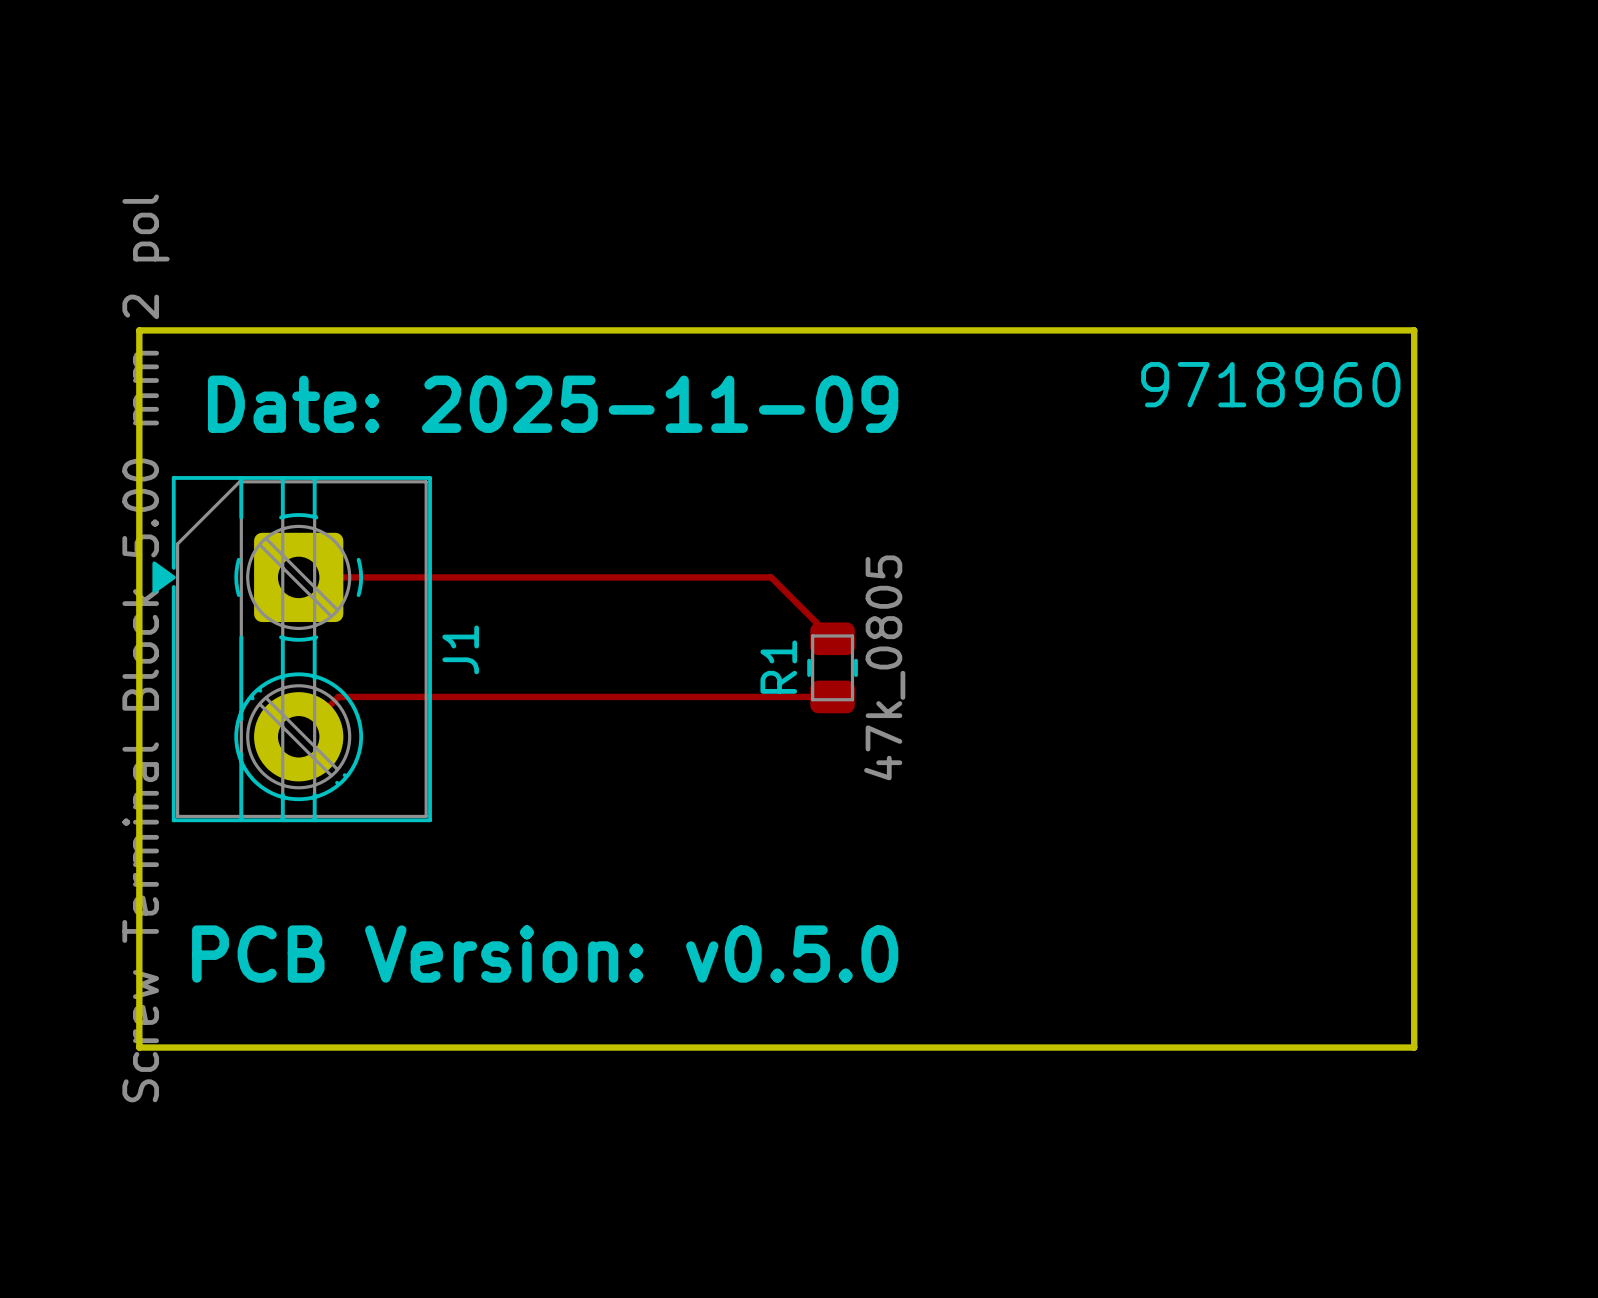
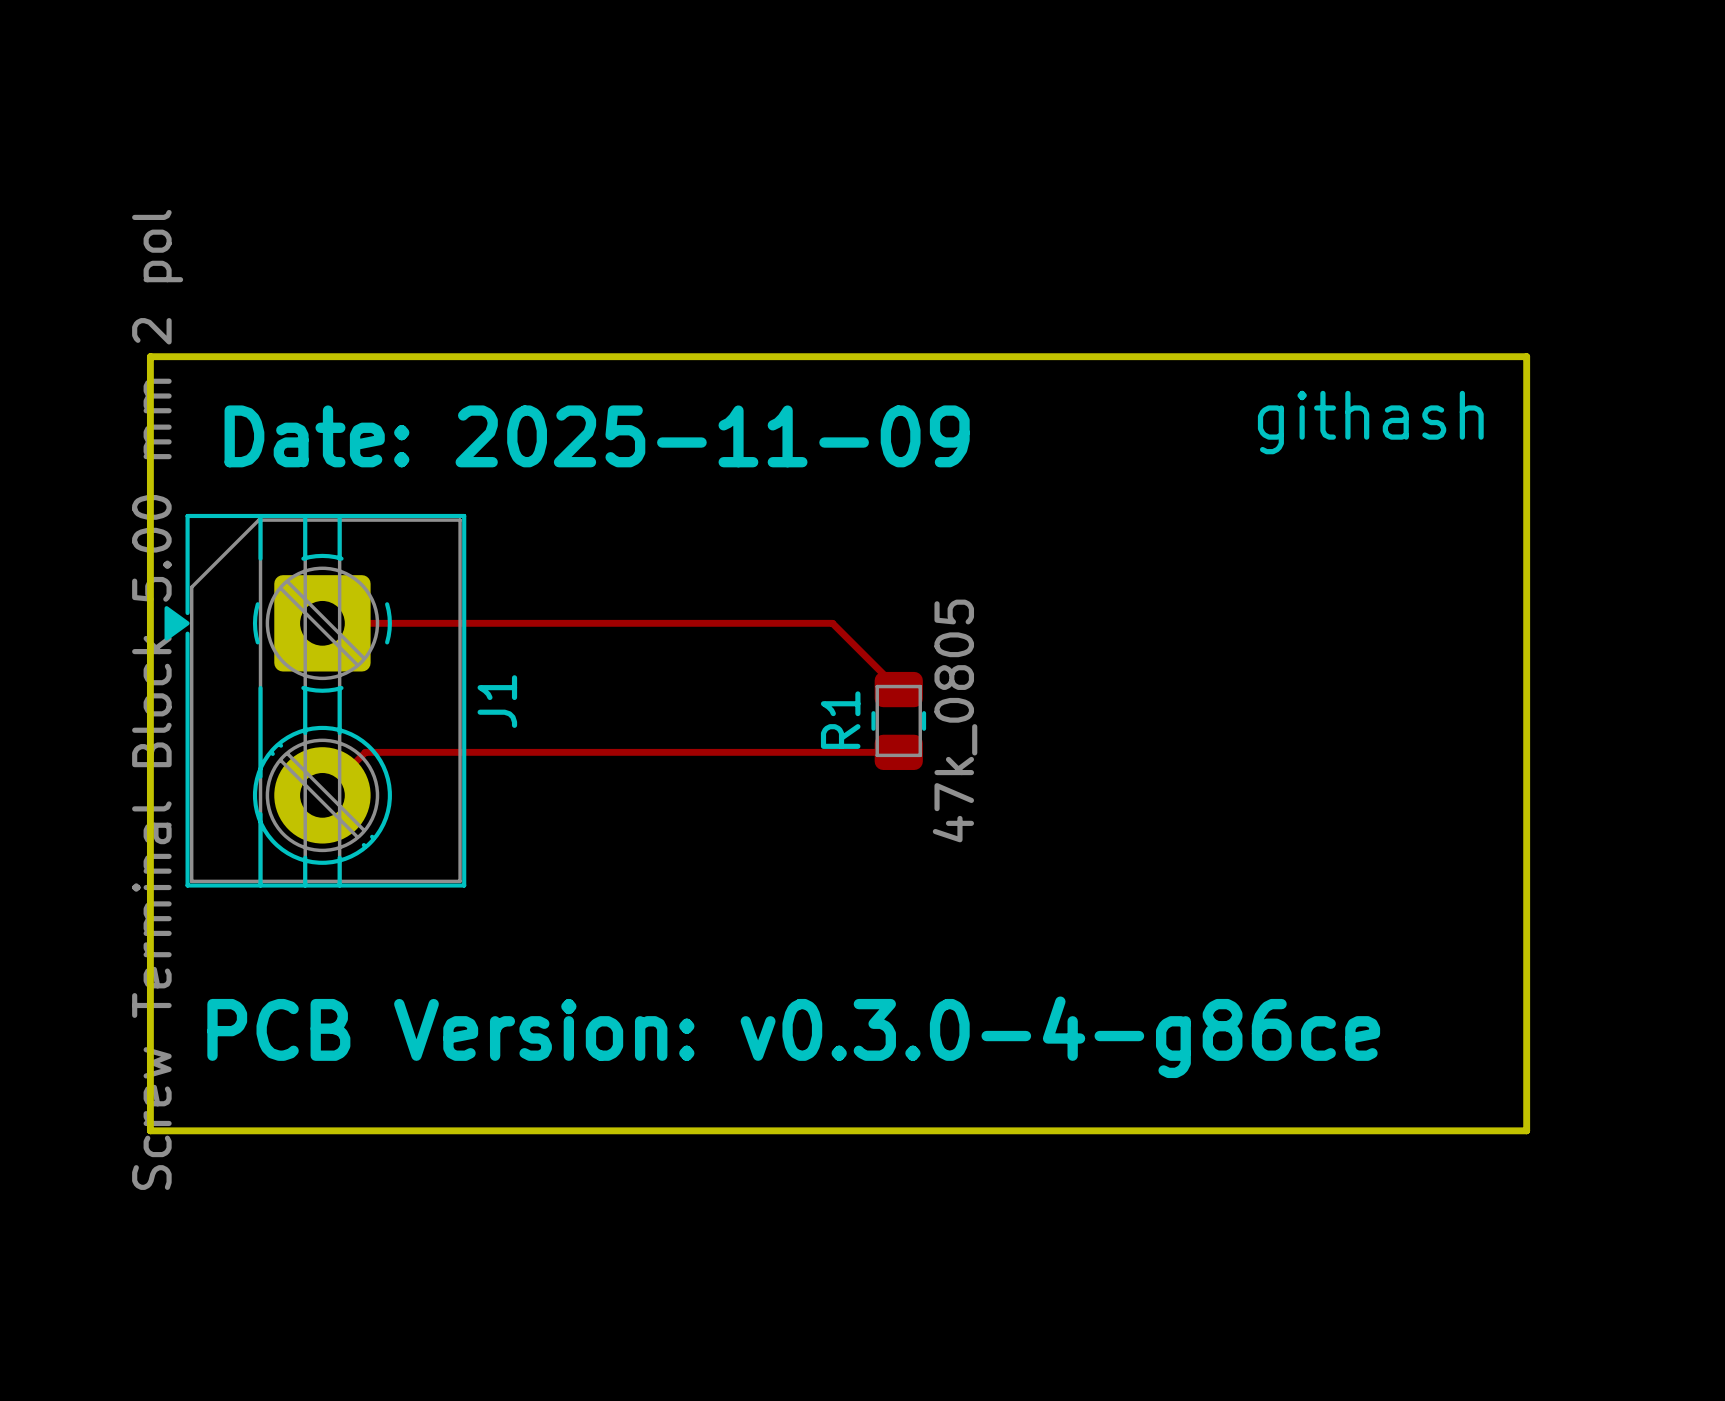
text: 9718960 (1270, 384) -> githash (1370, 422)
text: PCB Version: v0.5.0 (545, 954) -> PCB Version: v0.3.0-4-g86ce (793, 1037)

